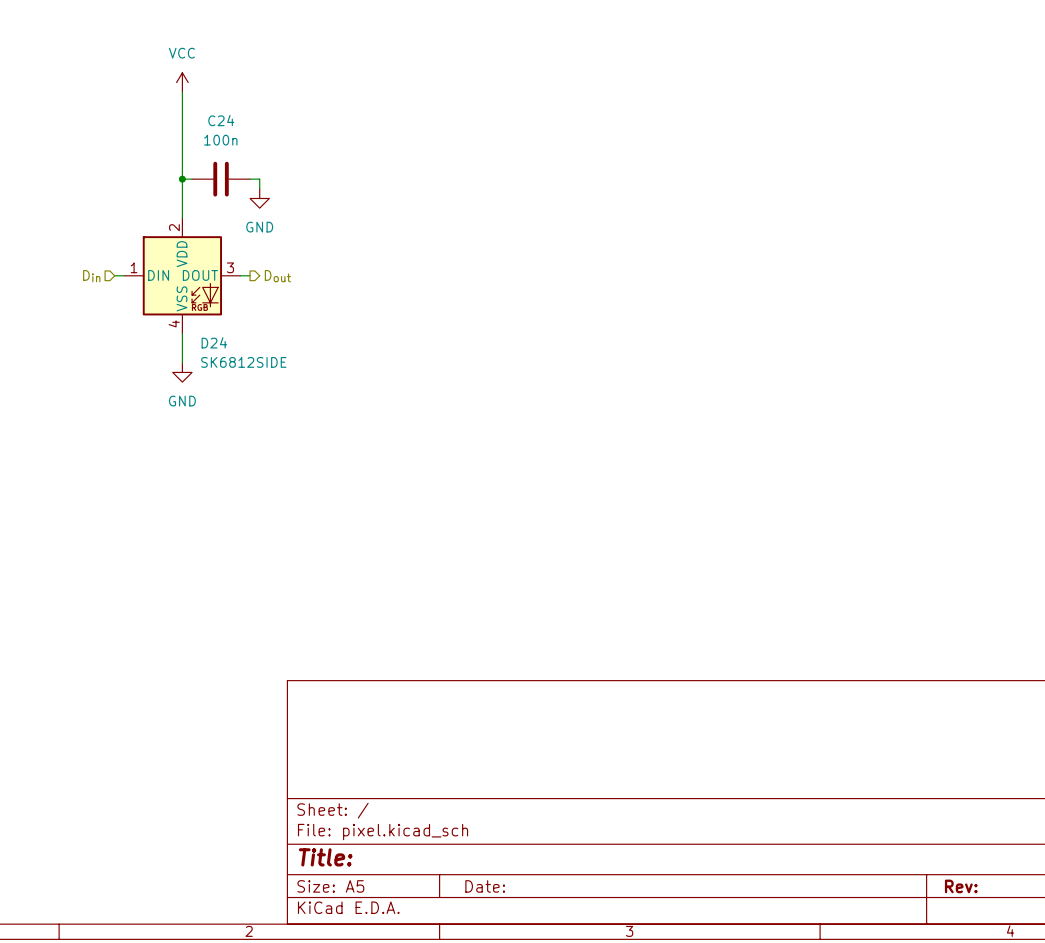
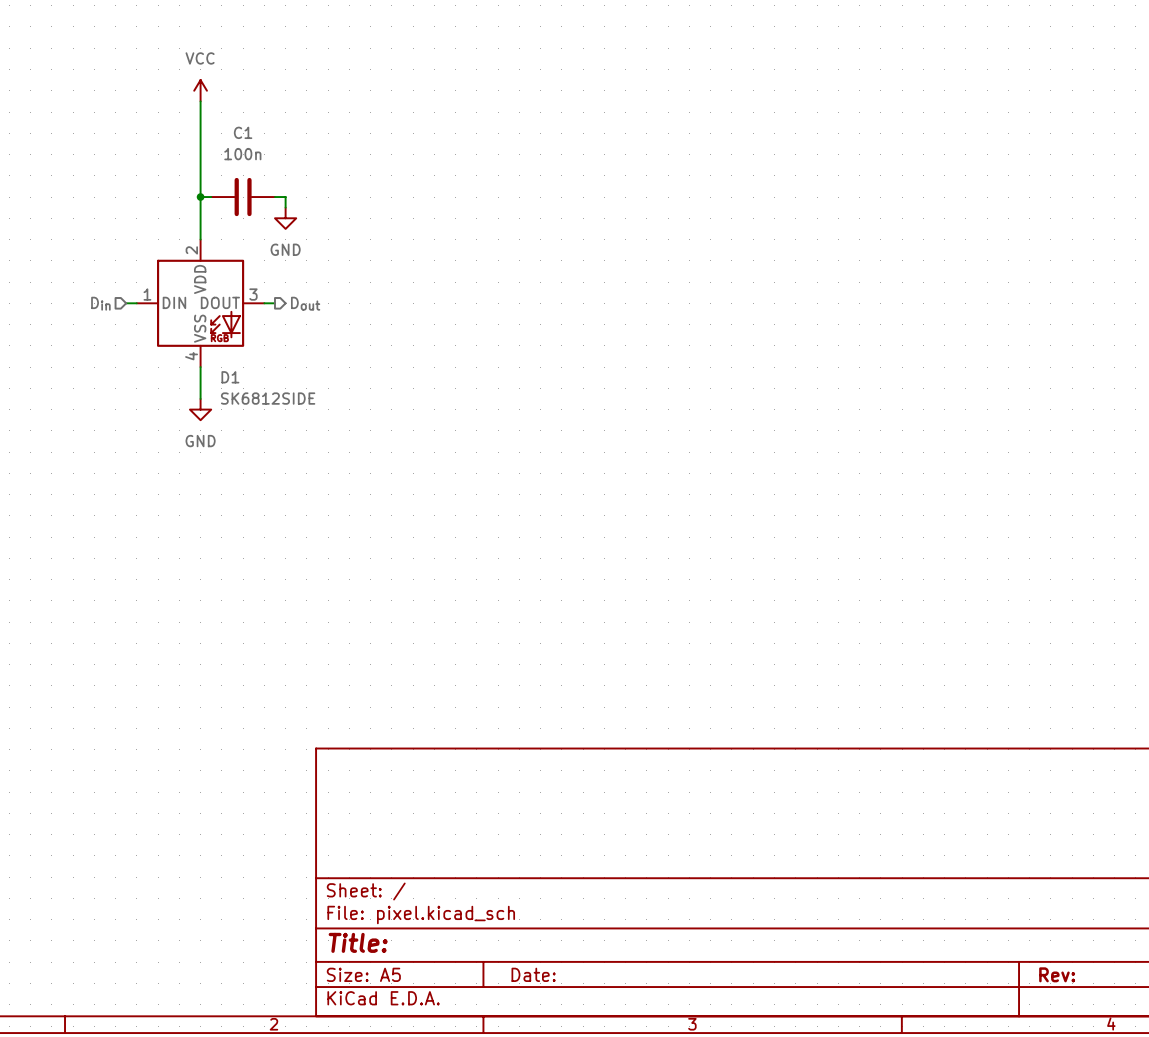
C24 name: C24 (221, 120) -> C1 (243, 132)
D24 name: D24 (214, 342) -> D1 (230, 377)

